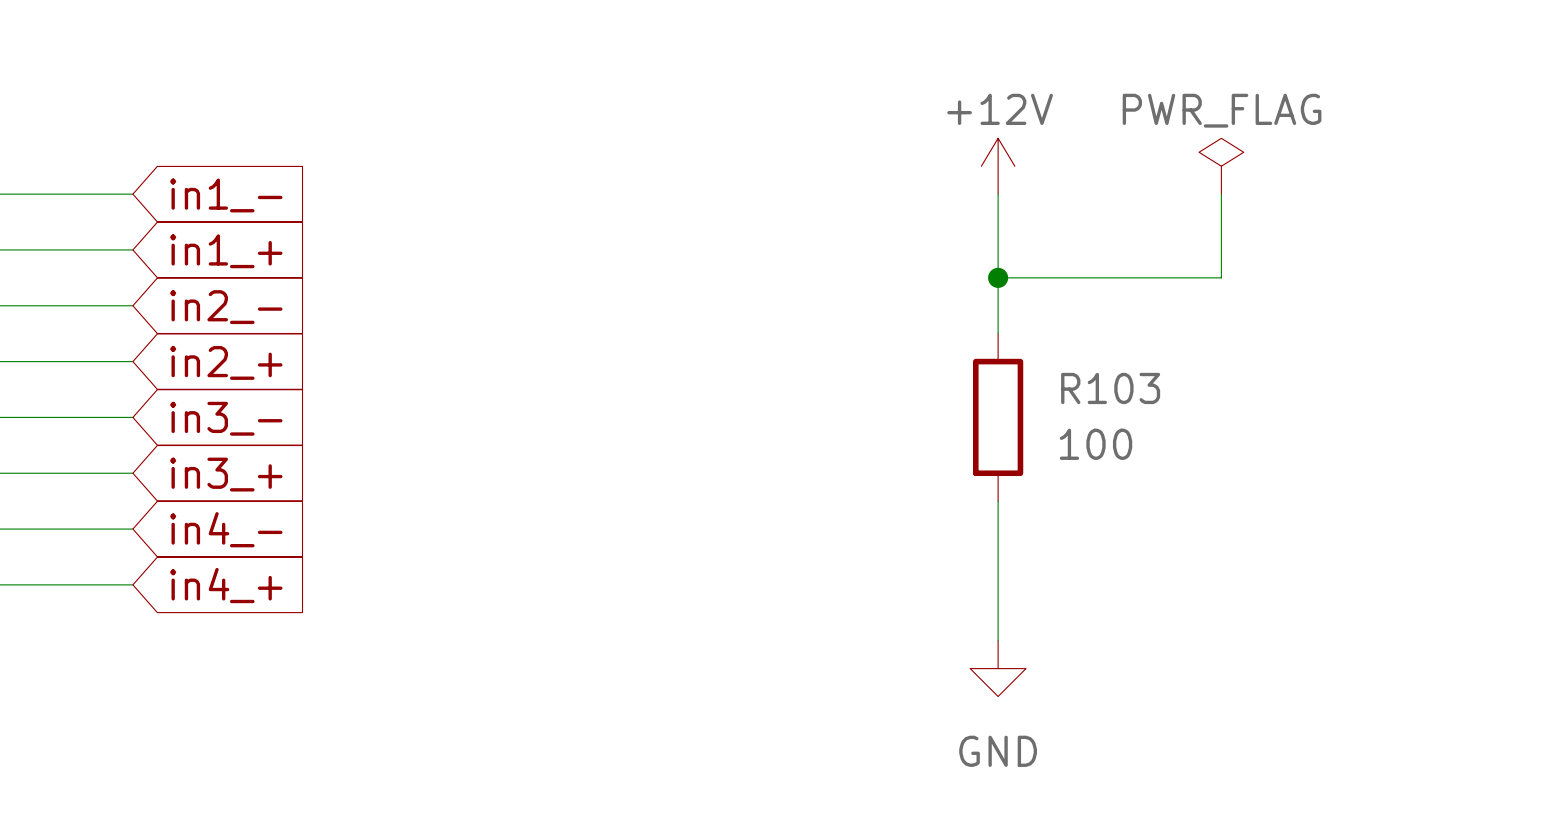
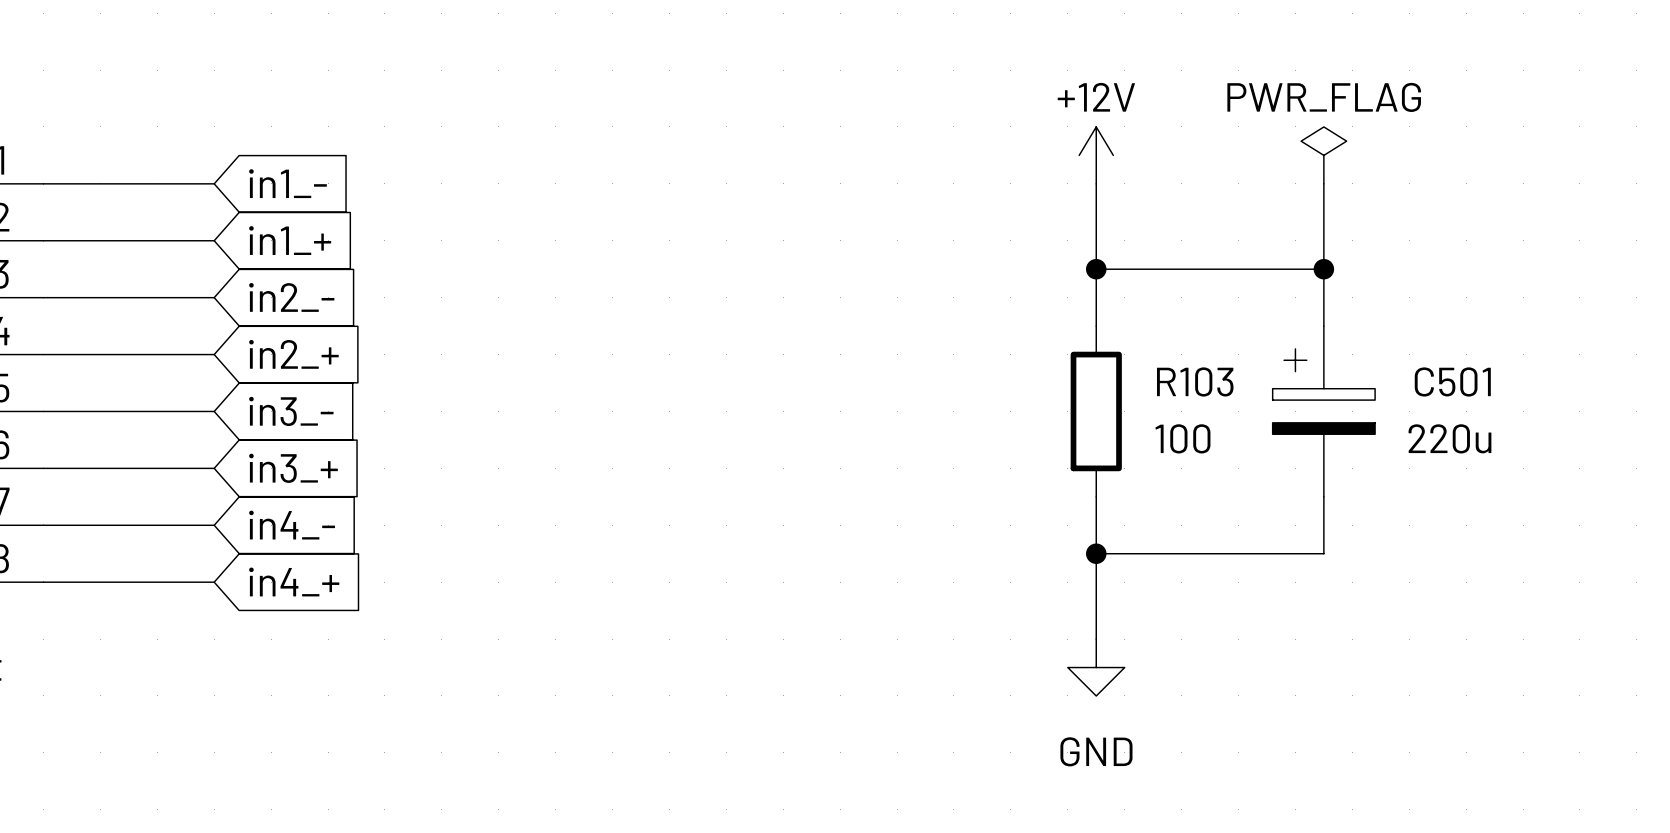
wire: none -> (1323, 269) (1323, 326)
junction: none -> (1323, 269)
C501: none -> 220u (1323, 411)
wire: none -> (1323, 496) (1323, 553) (1096, 553)
junction: none -> (1096, 553)

